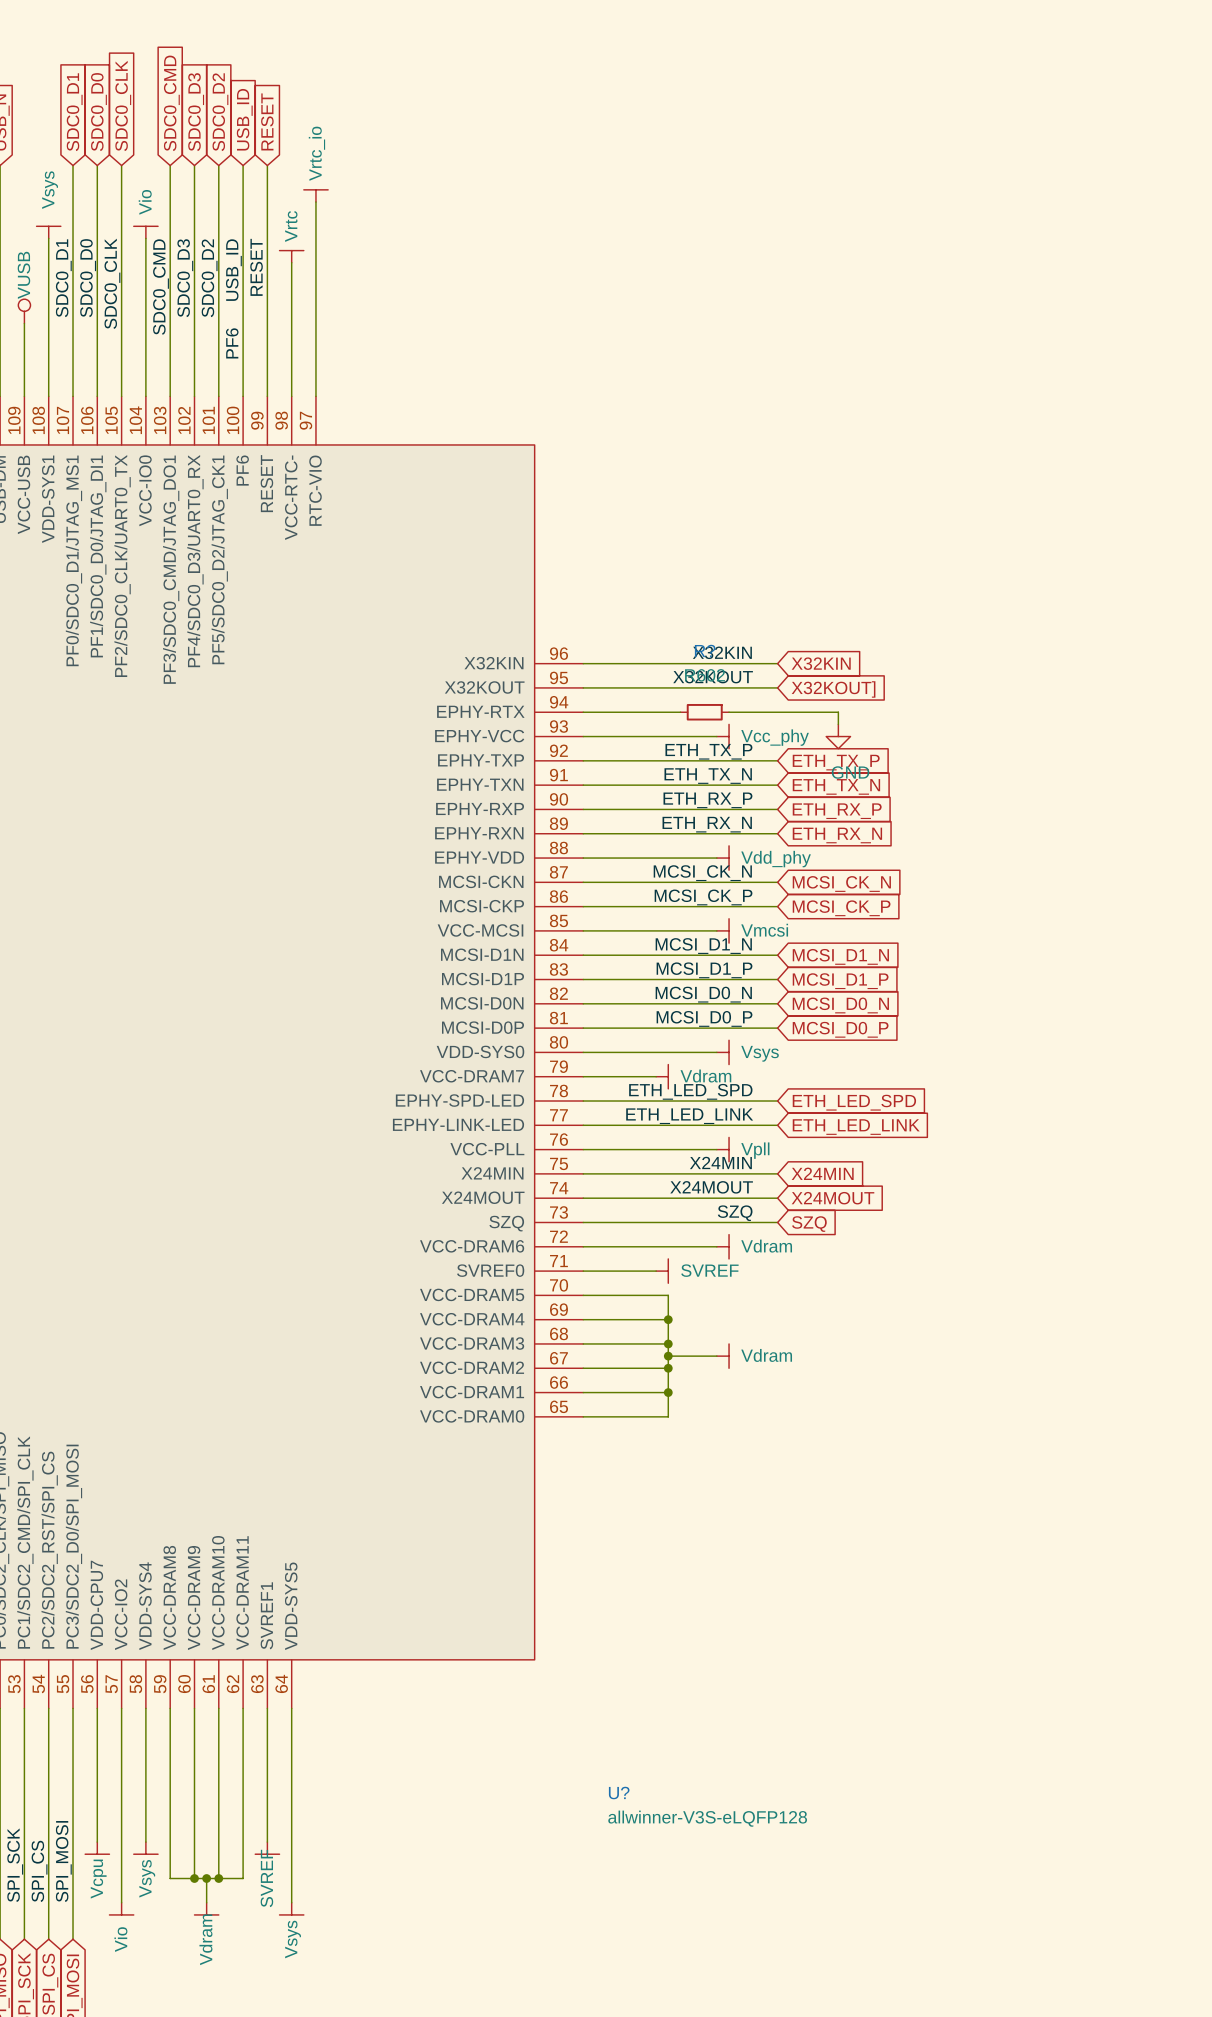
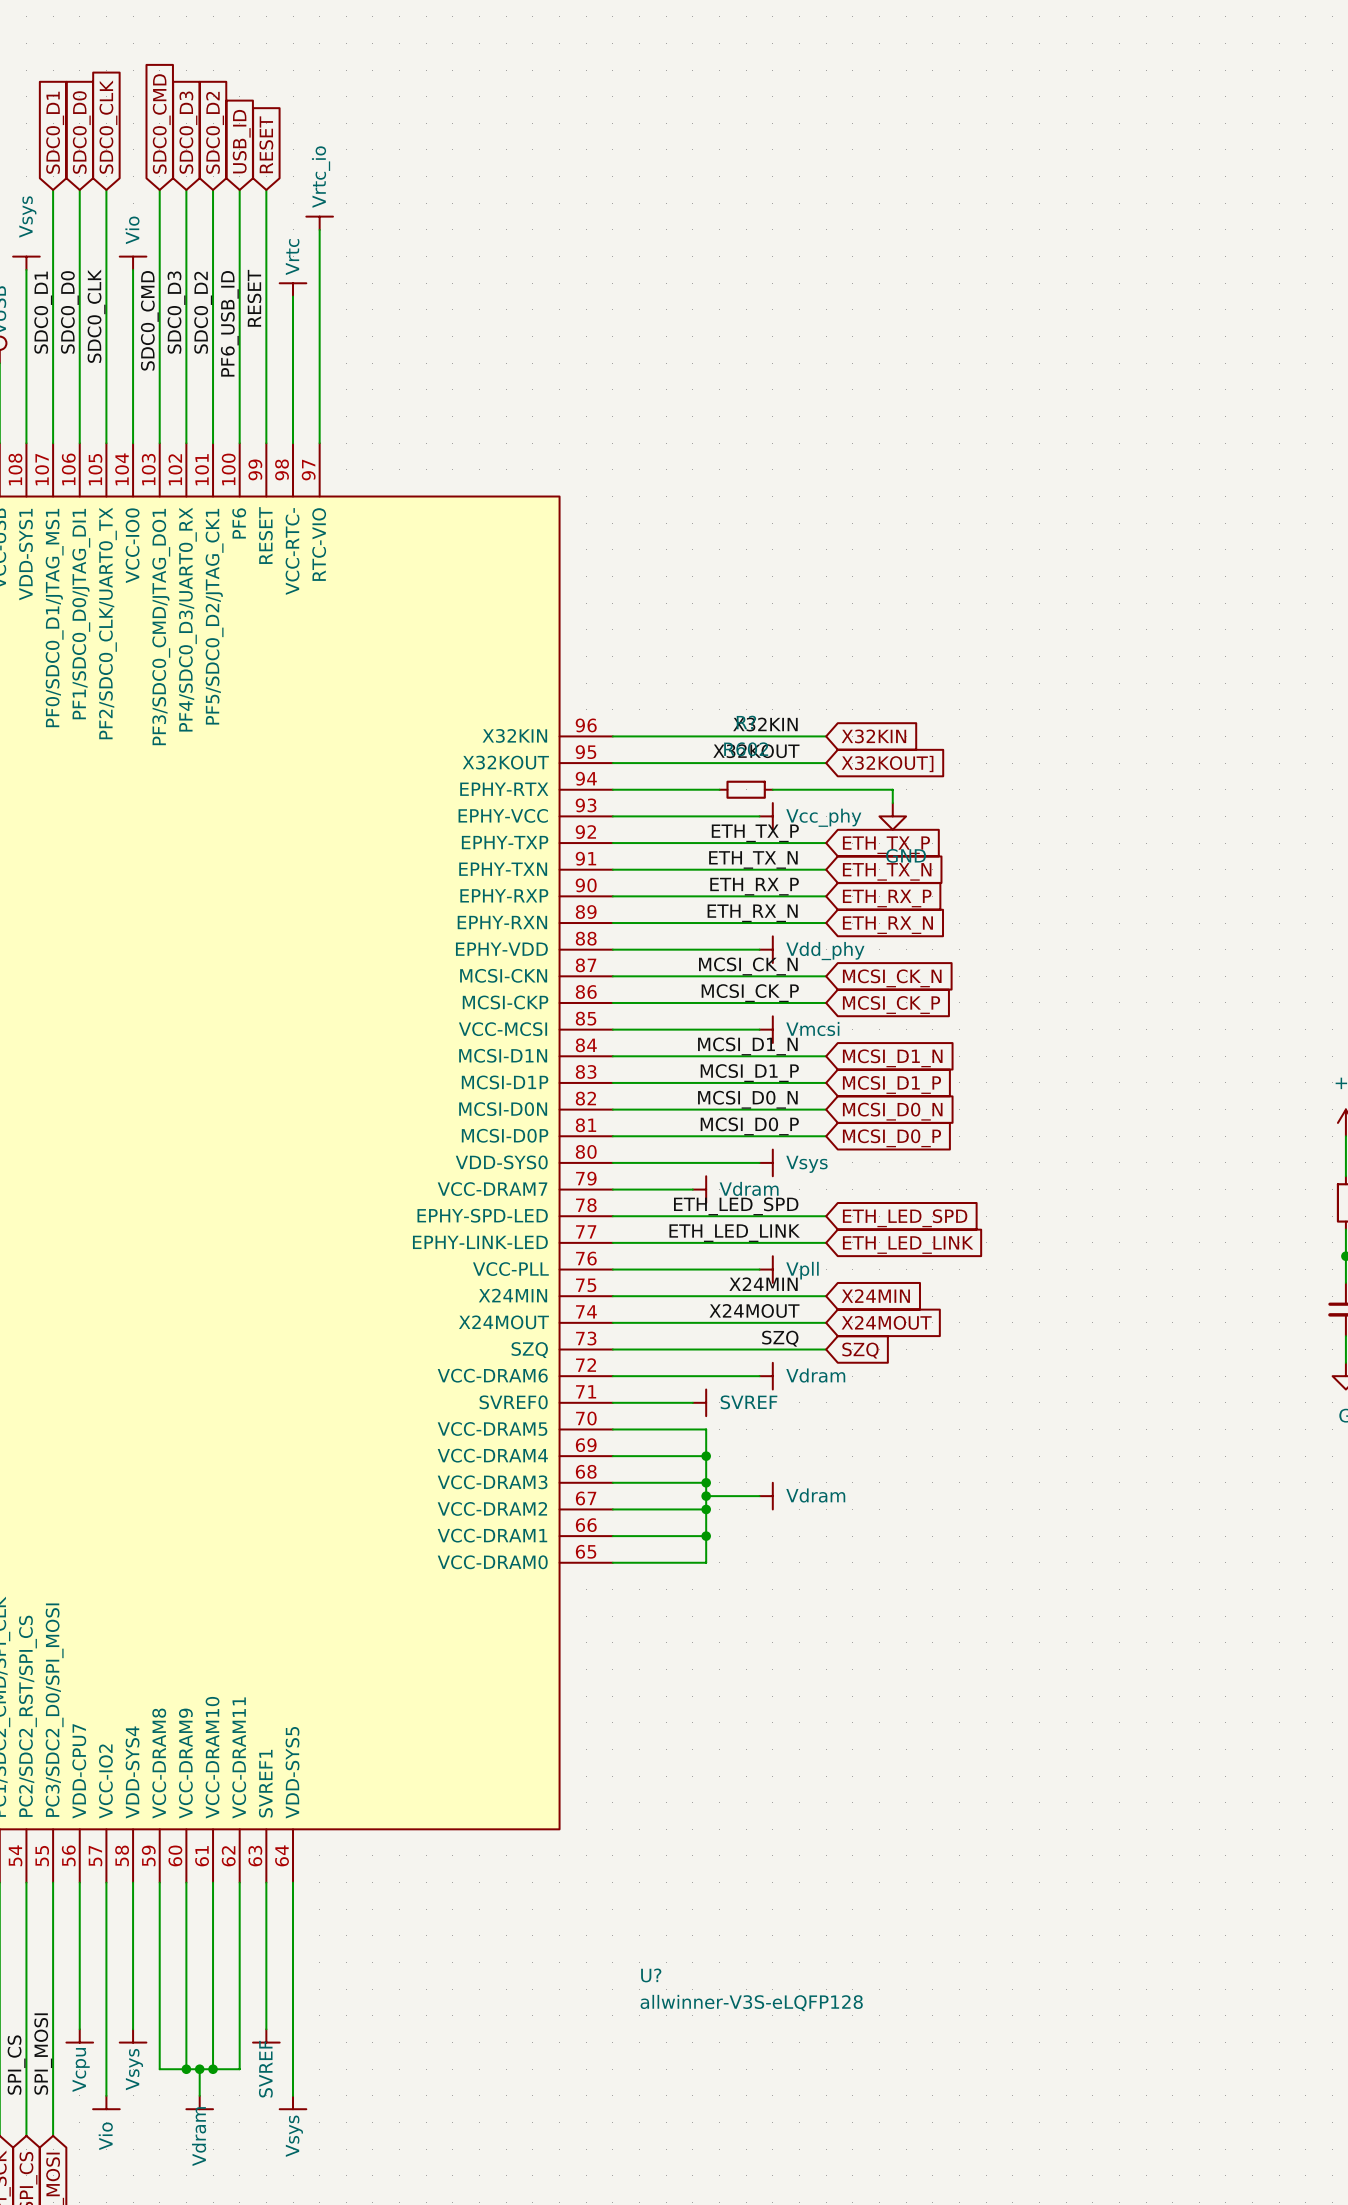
label: USB_ID (233, 270) -> PF6_USB_ID (229, 323)
label: PF6 (232, 343) -> none

